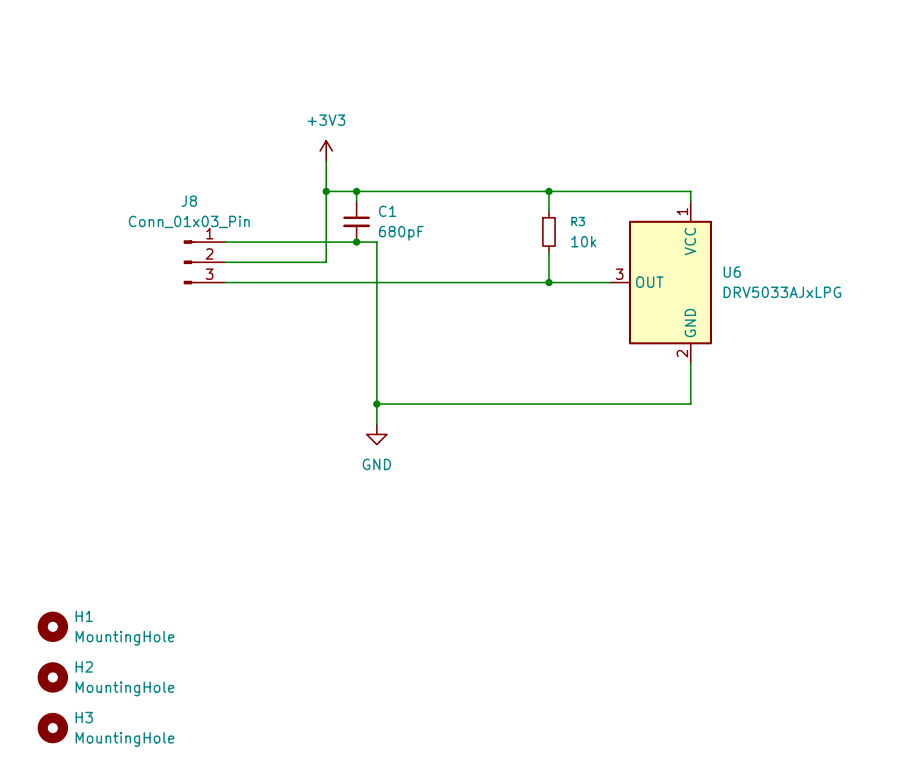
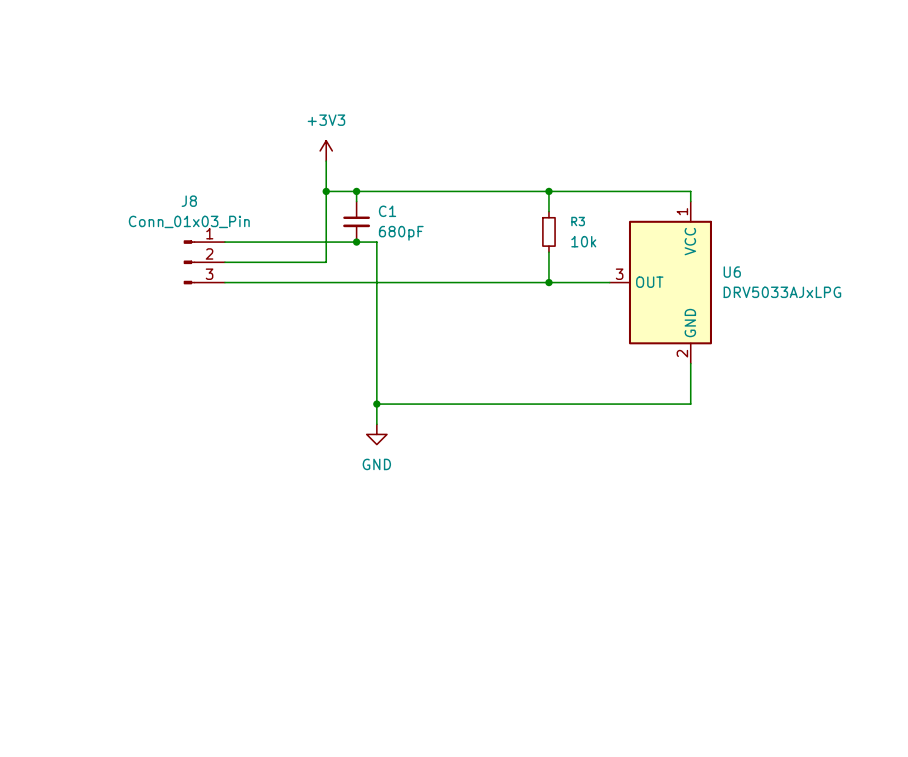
H1: MountingHole (52, 626) -> none
H2: MountingHole (52, 677) -> none
H3: MountingHole (52, 728) -> none

